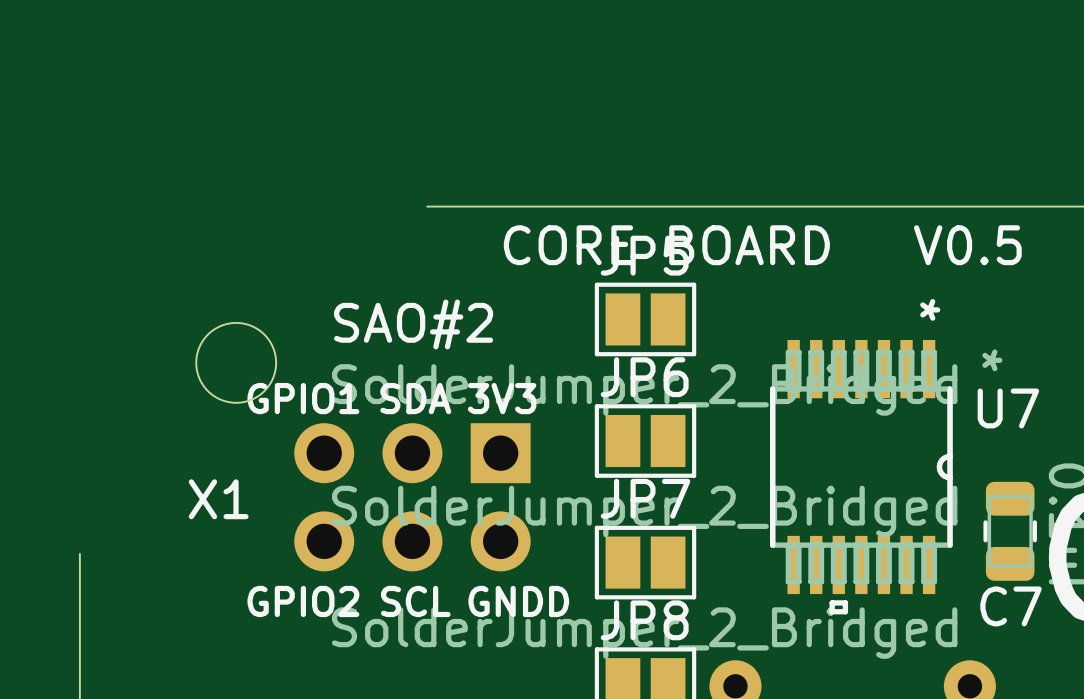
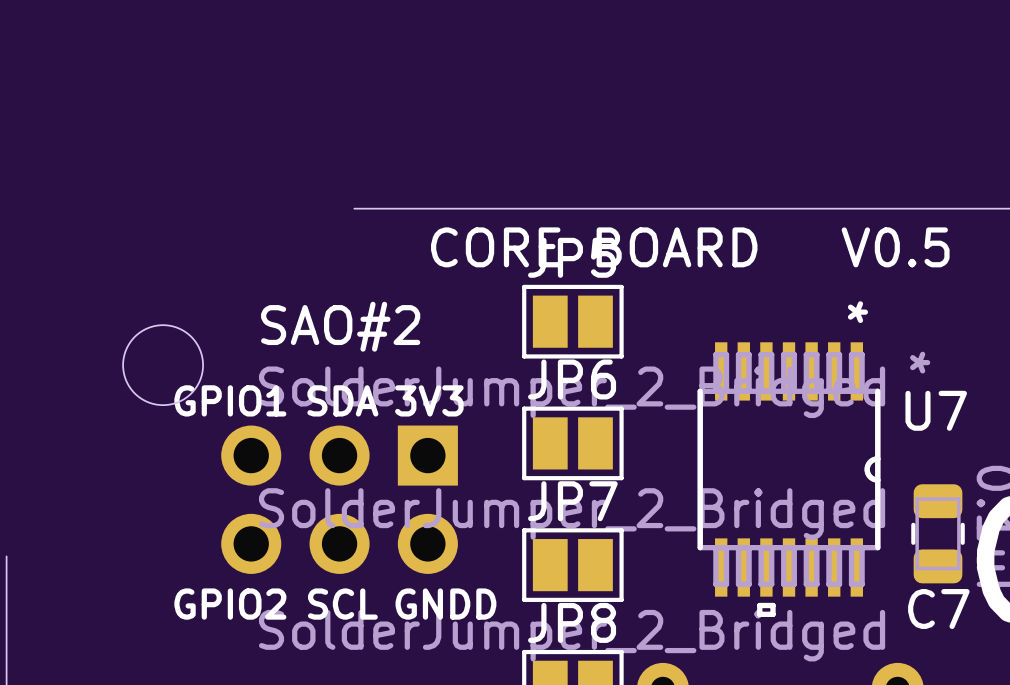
text: X1 (218, 499) -> none

